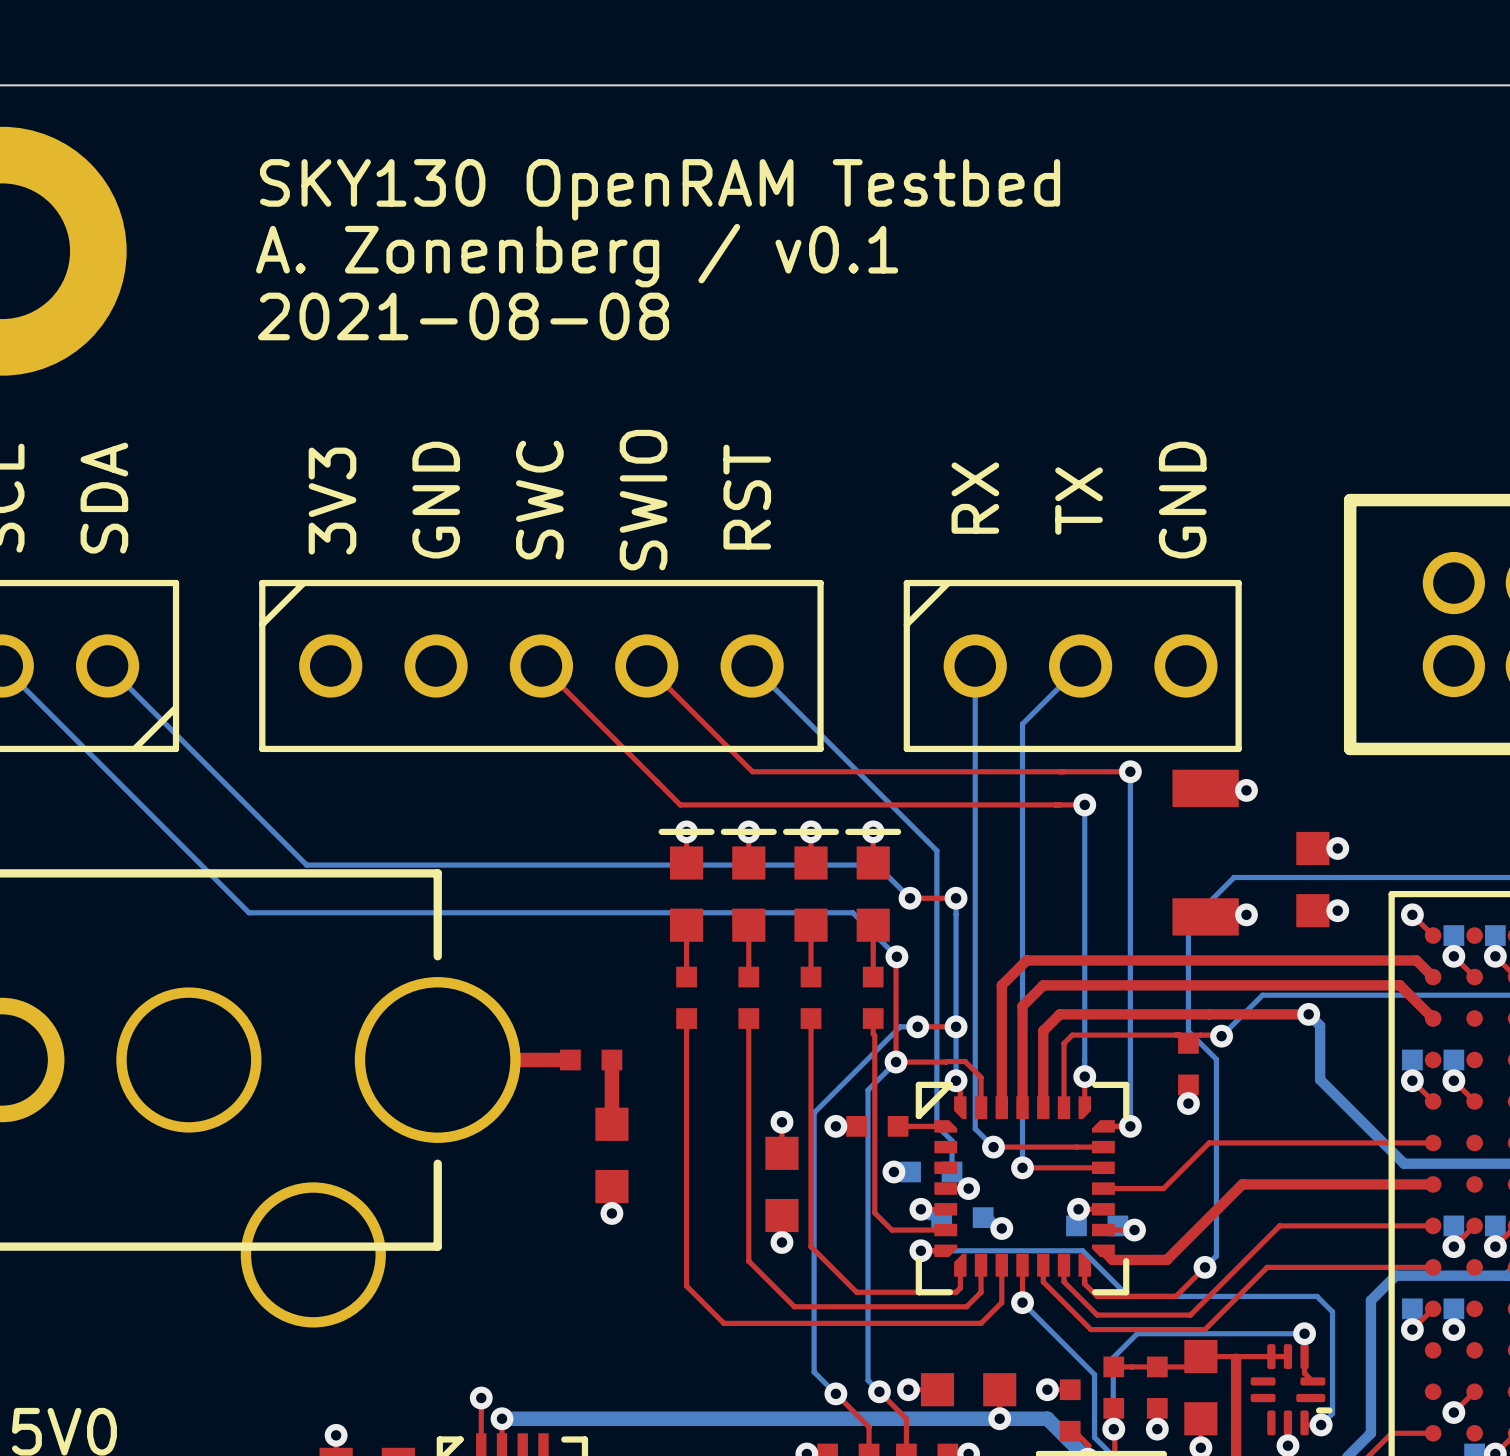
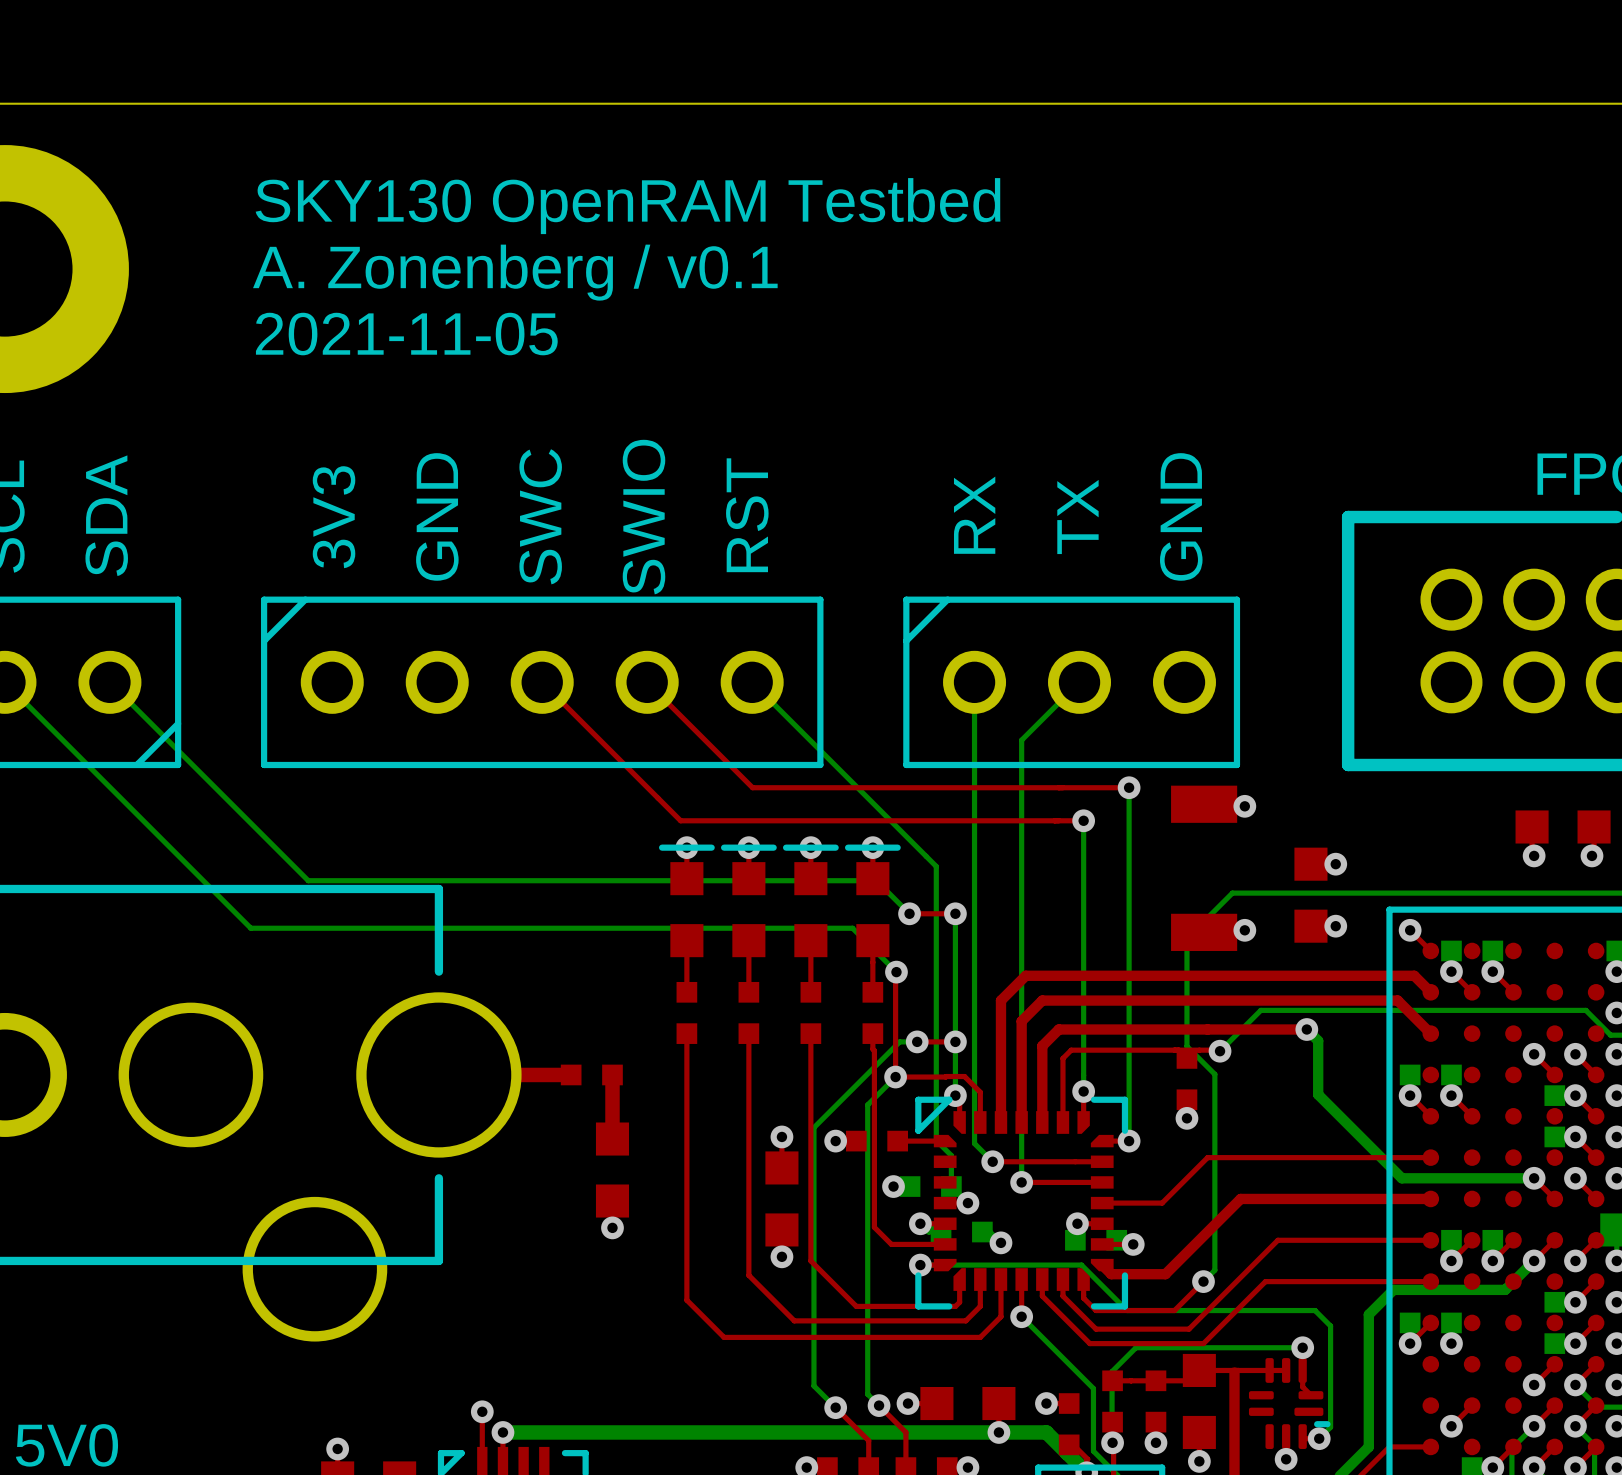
text: 2021-08-08 (463, 316) -> 2021-11-05 (406, 334)

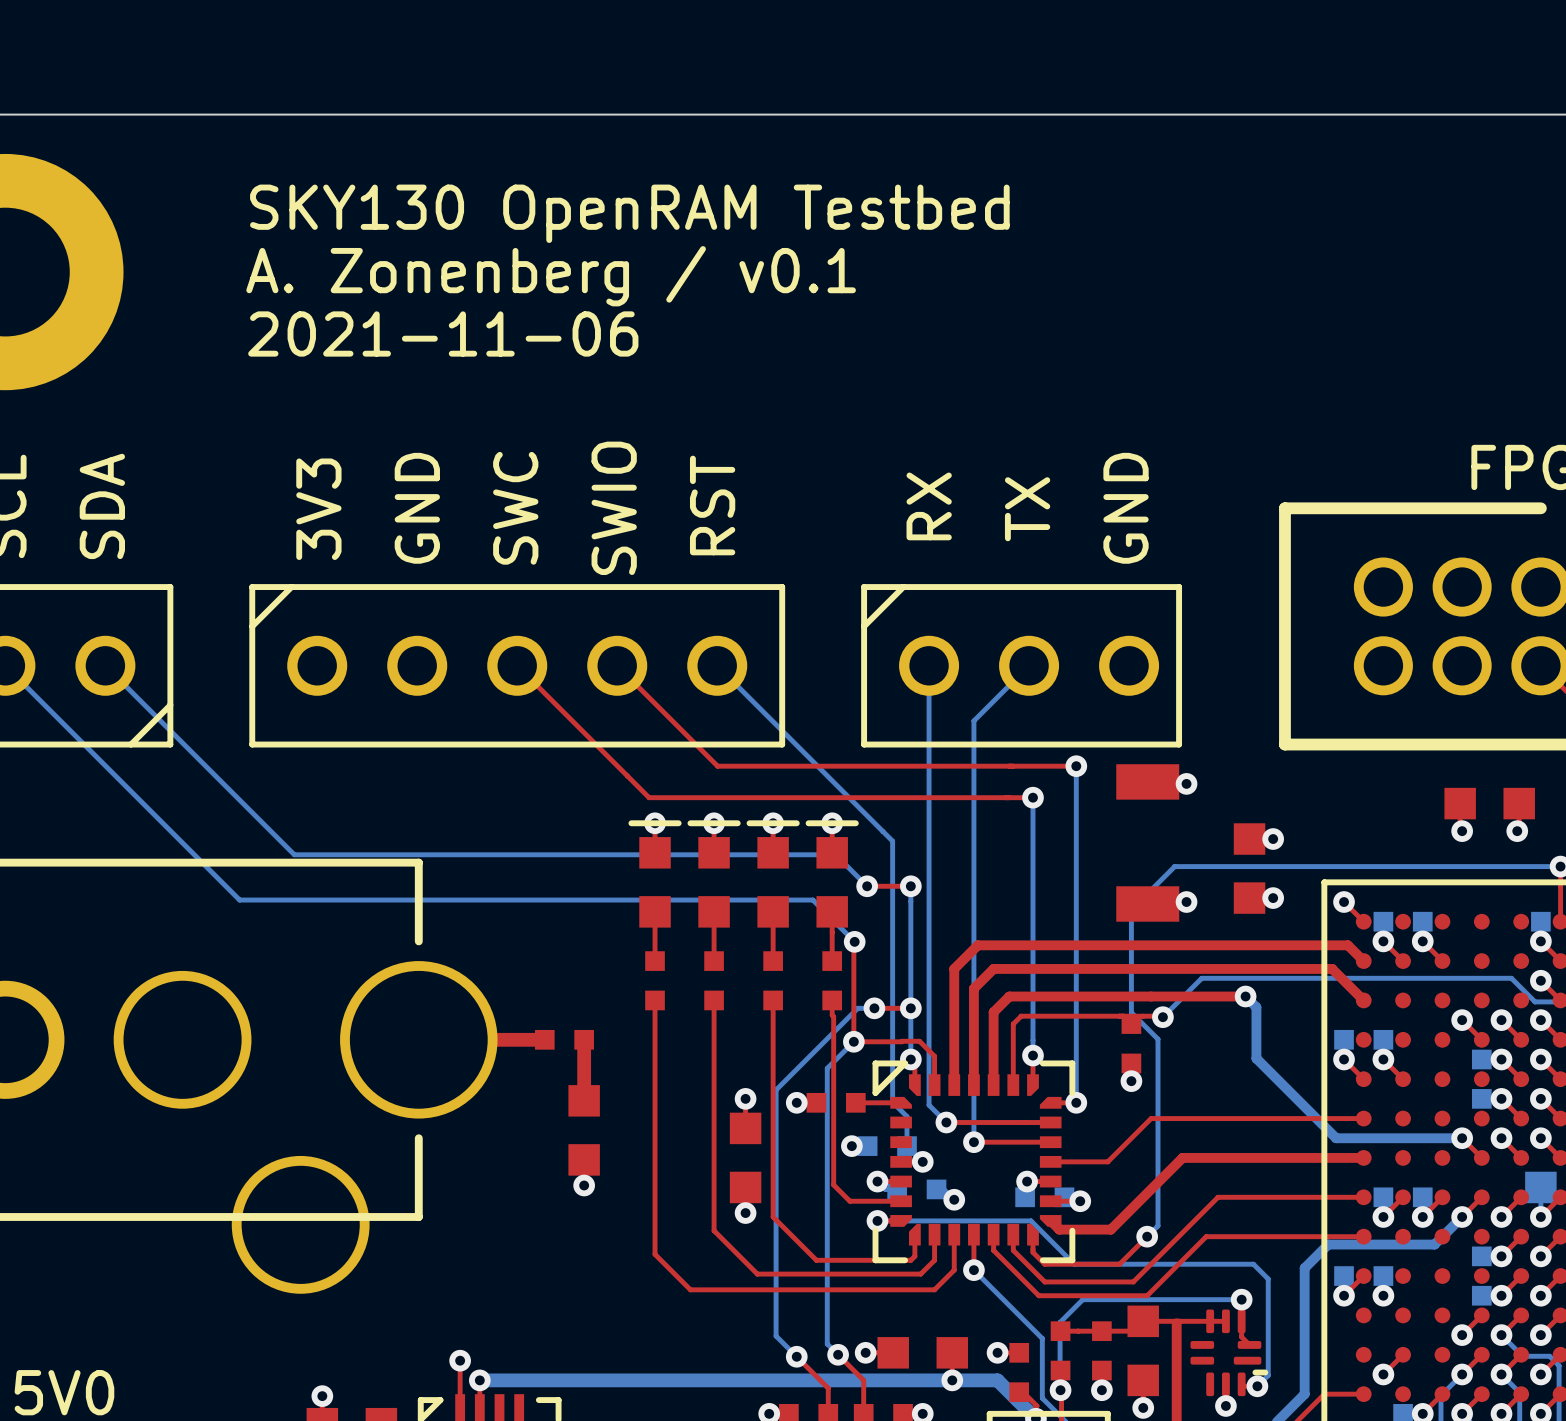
text: 2021-11-05 (406, 334) -> 2021-11-06 (443, 333)

